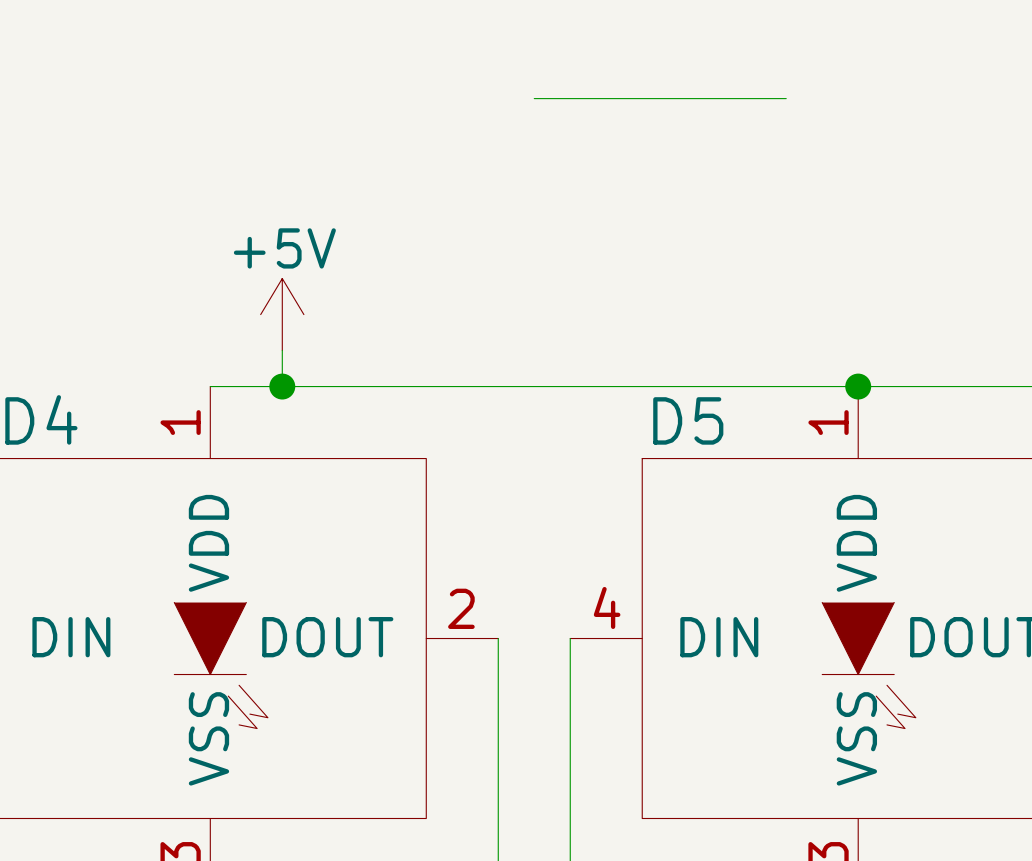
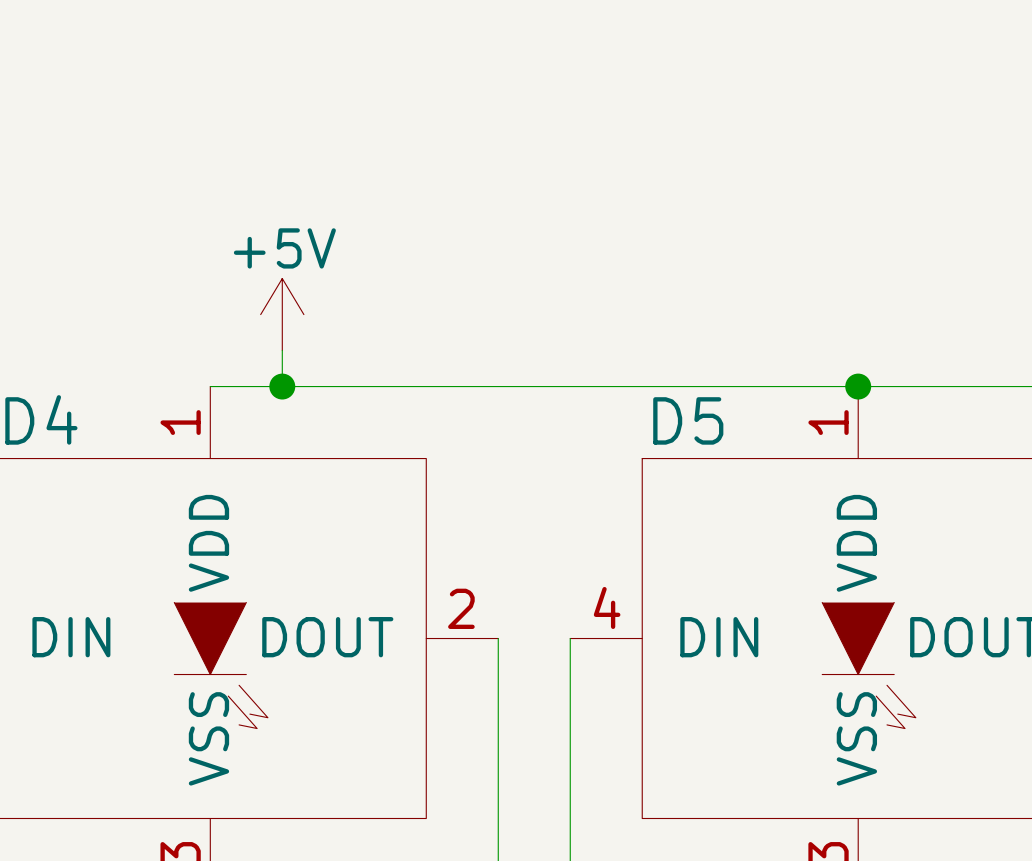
wire: (534, 98) (786, 98) -> none

